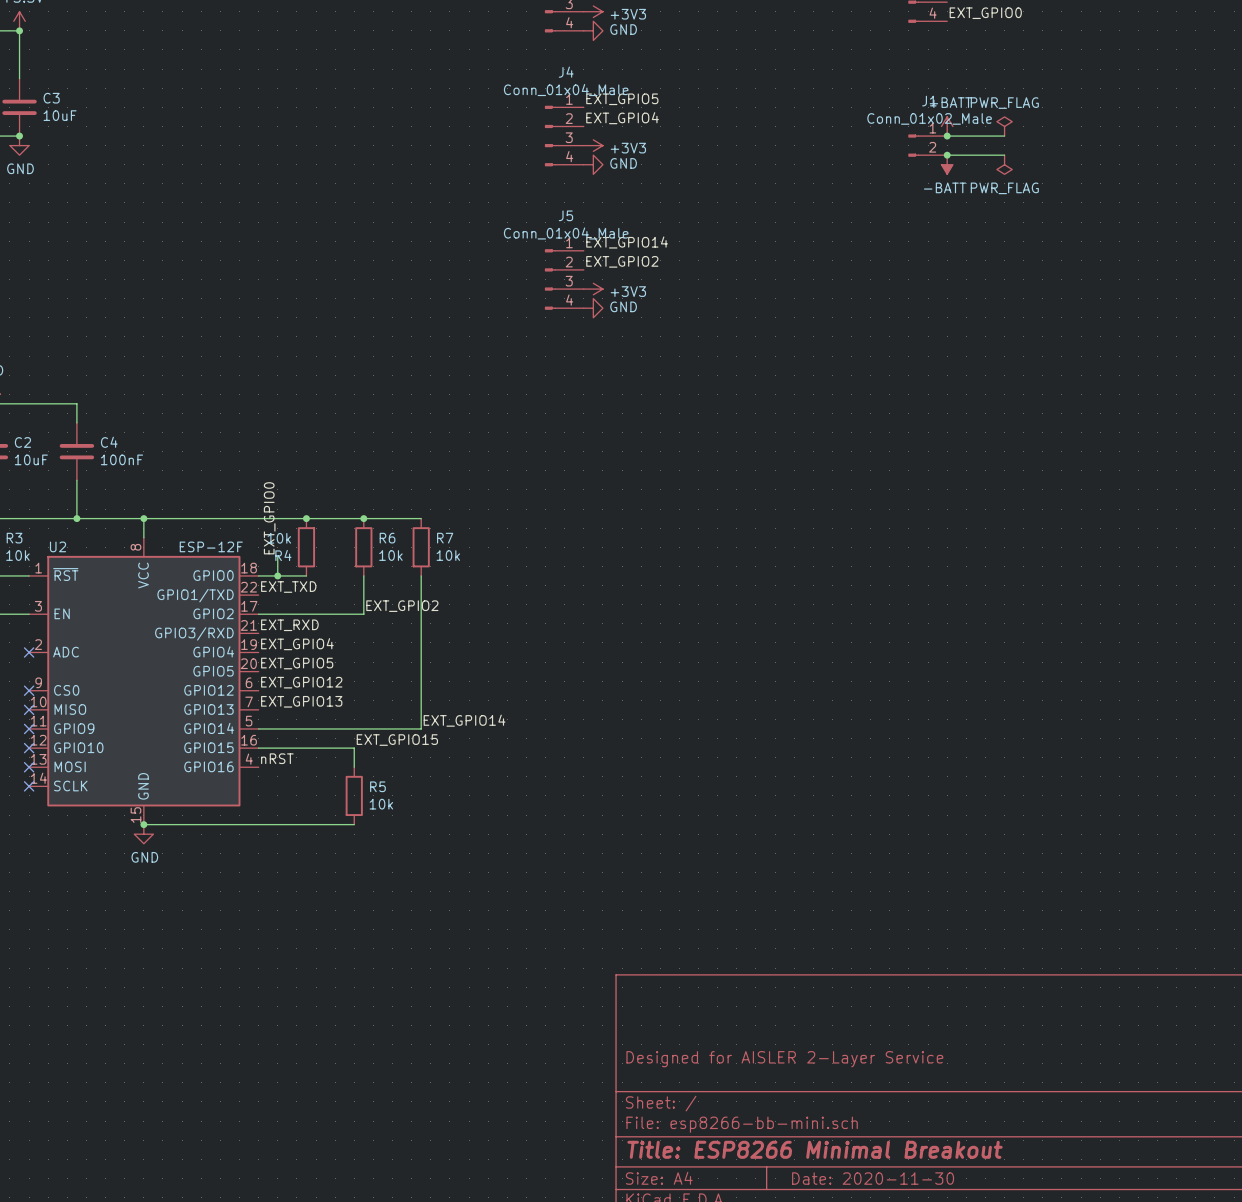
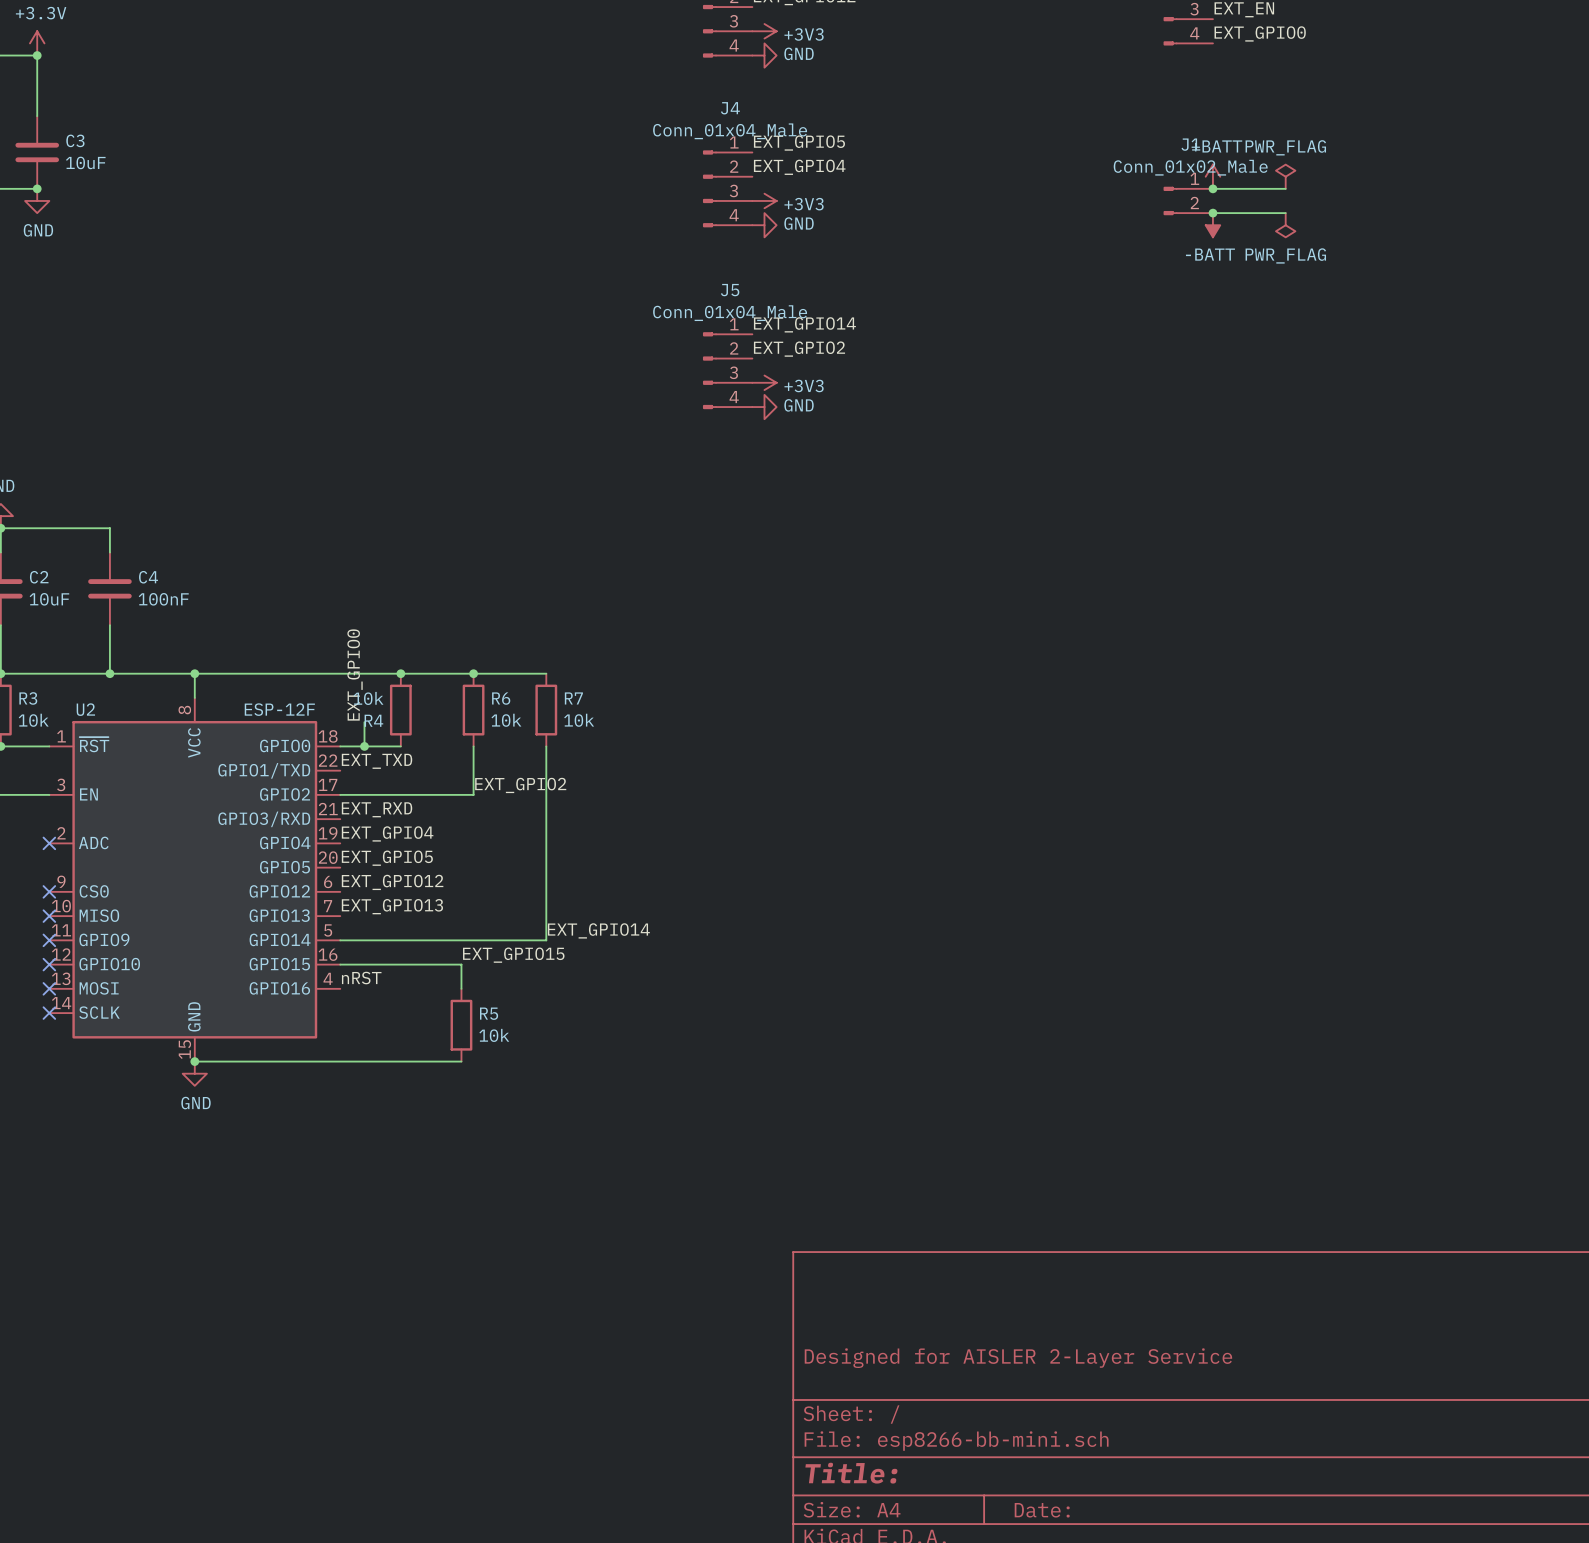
title block: Title: ESP8266 Minimal Breakout (815, 1149) -> Title: (851, 1473)
title block: Date: 2020-11-30 (873, 1178) -> Date: (1042, 1510)

